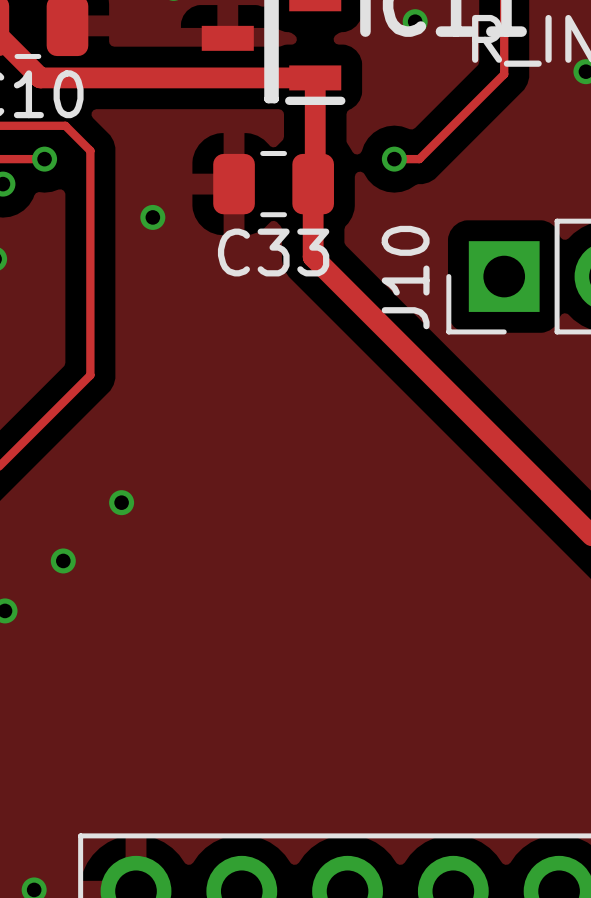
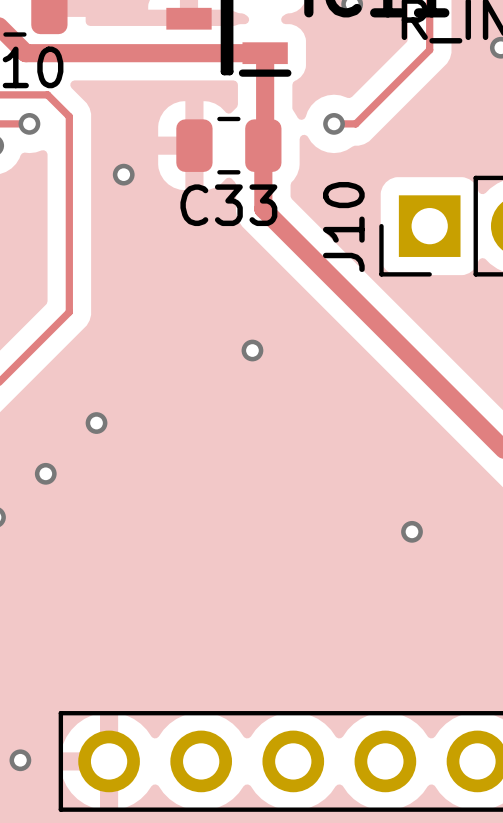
via: none -> (252, 350)
via: none -> (412, 531)

